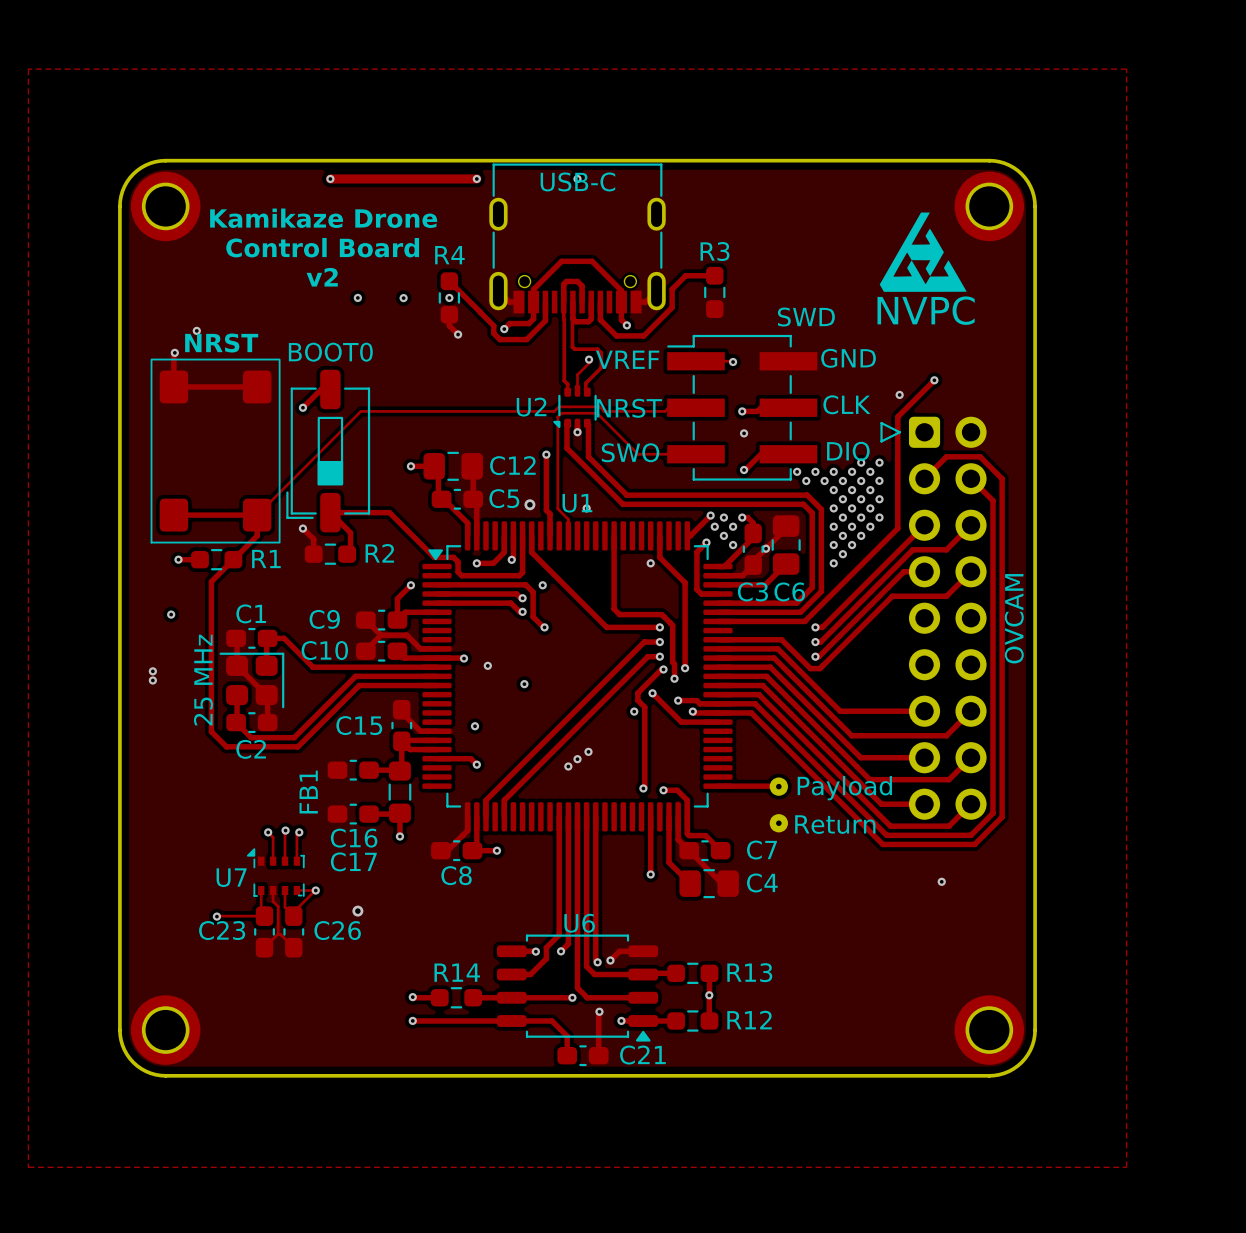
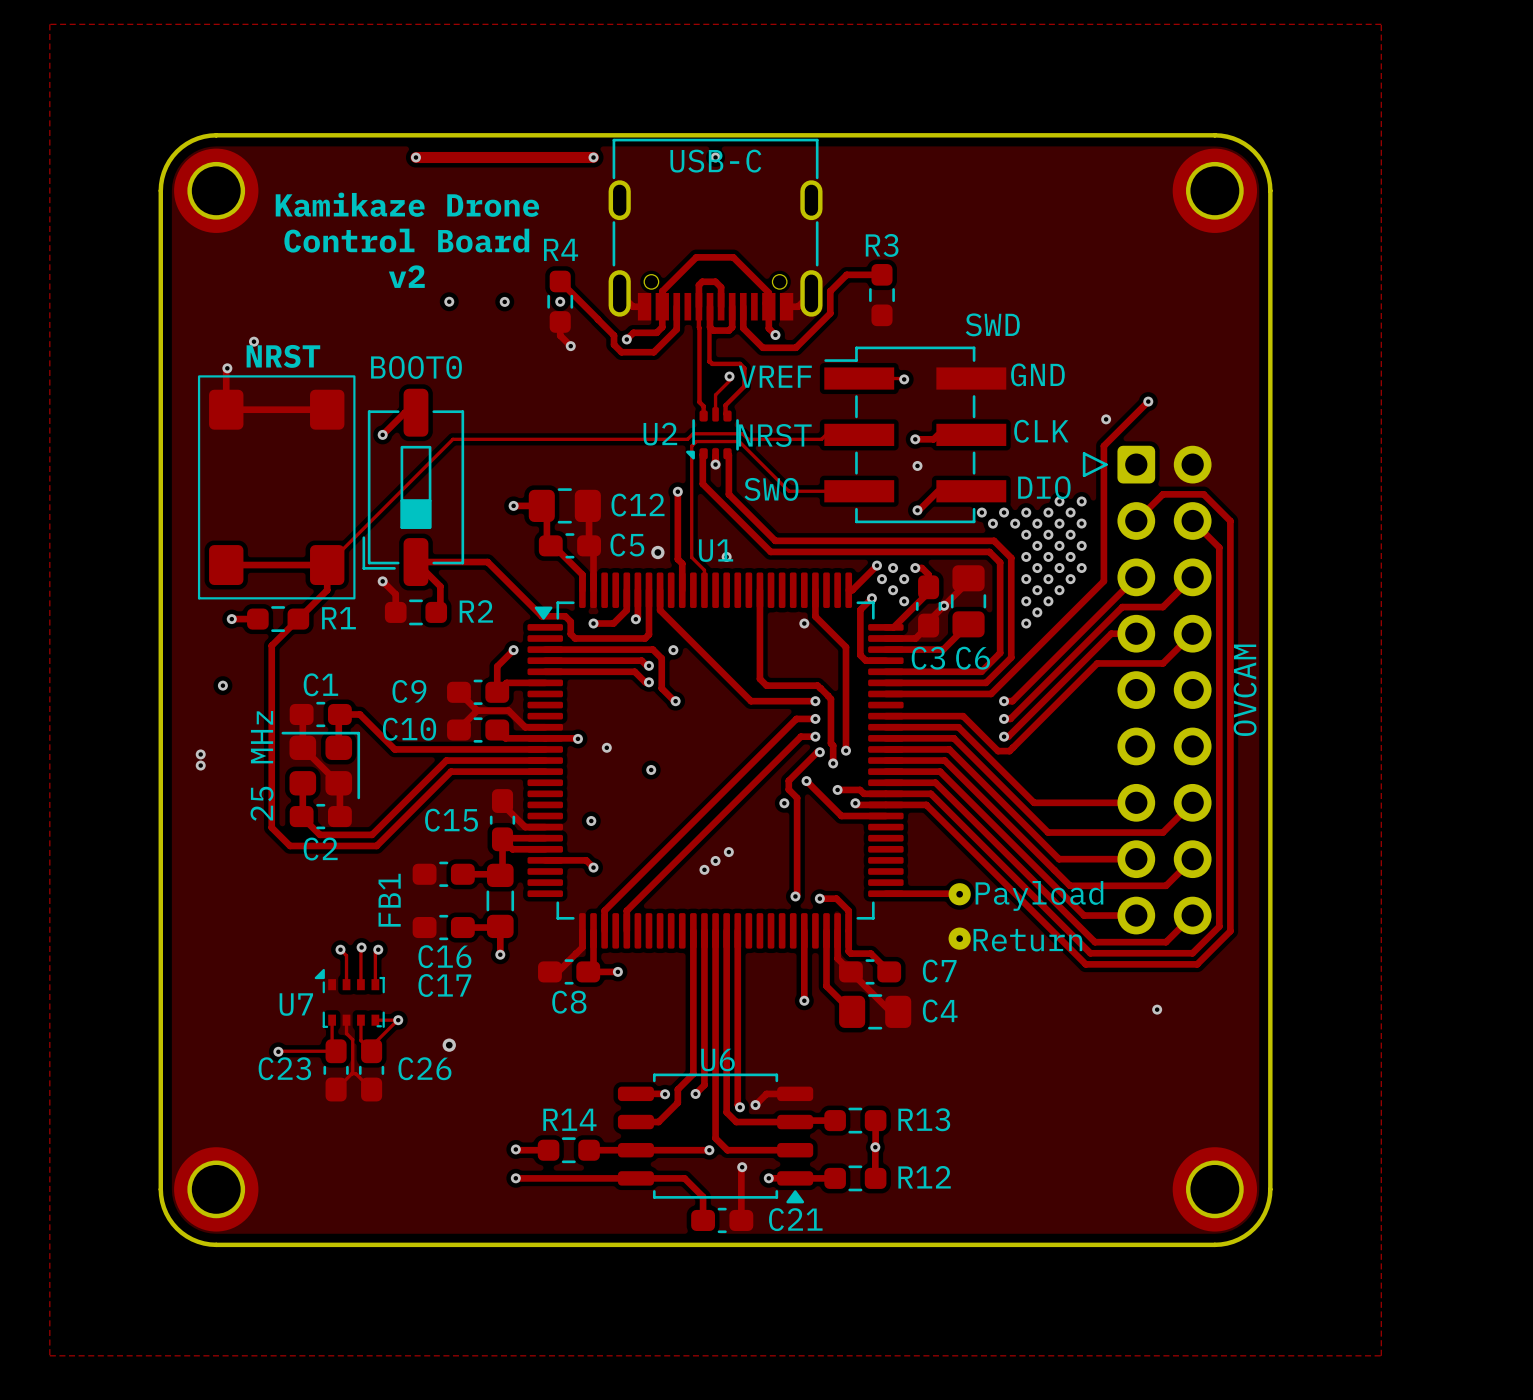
NVPC: (923, 252) -> none

